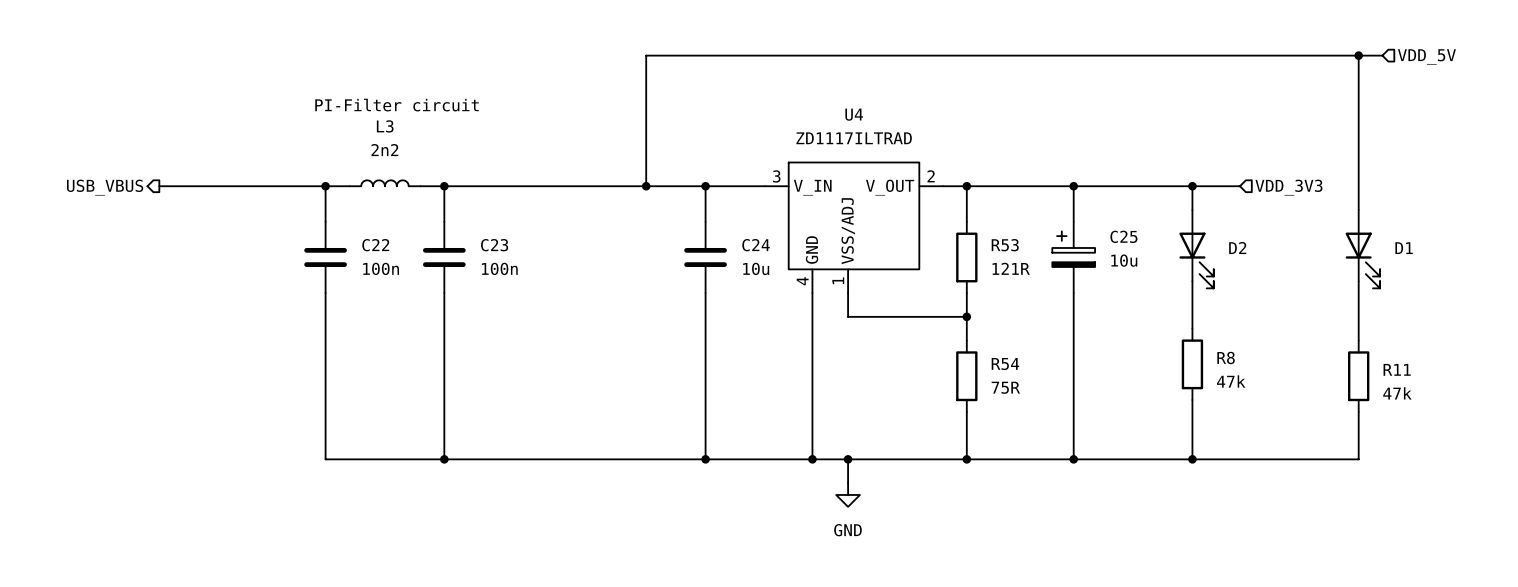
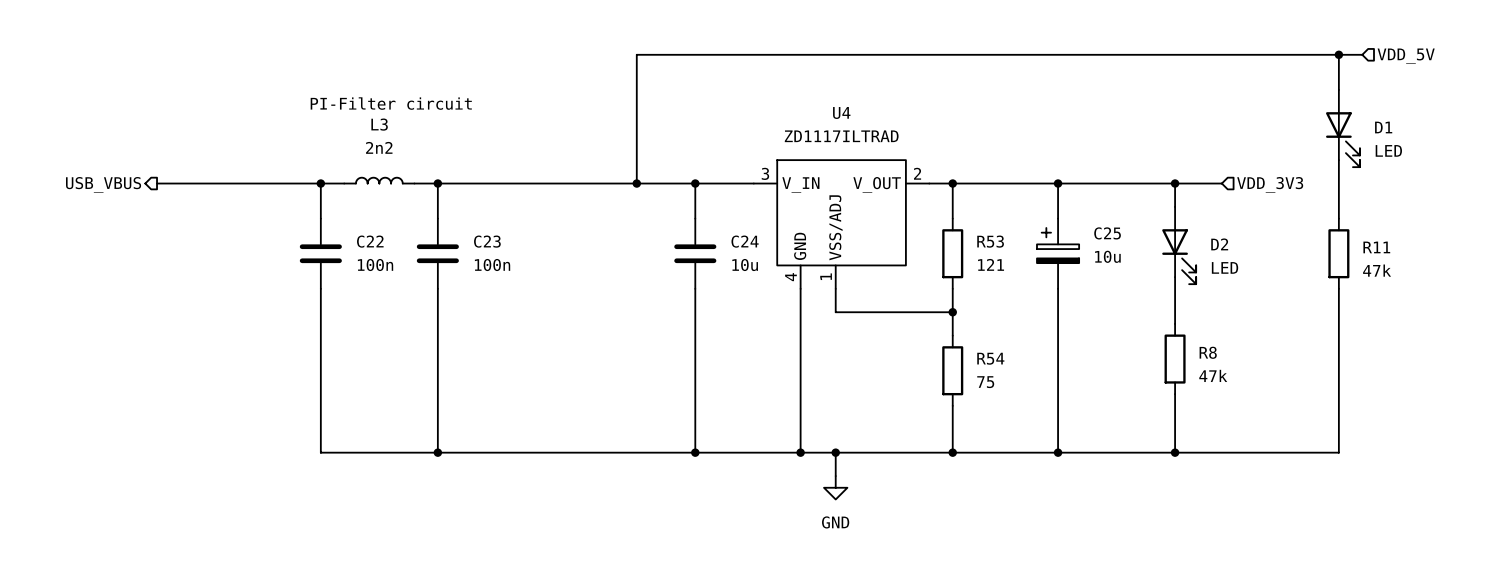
D1 value: none -> LED (1388, 150)
D1 position: (1362, 249) -> (1342, 128)
R53 value: 121R (1011, 268) -> 121 (991, 264)
D2 value: none -> LED (1225, 267)
wire: none -> (1338, 335) (1338, 405)
R11 position: (1358, 376) -> (1338, 253)
R54 value: 75R (1005, 387) -> 75 (985, 382)

